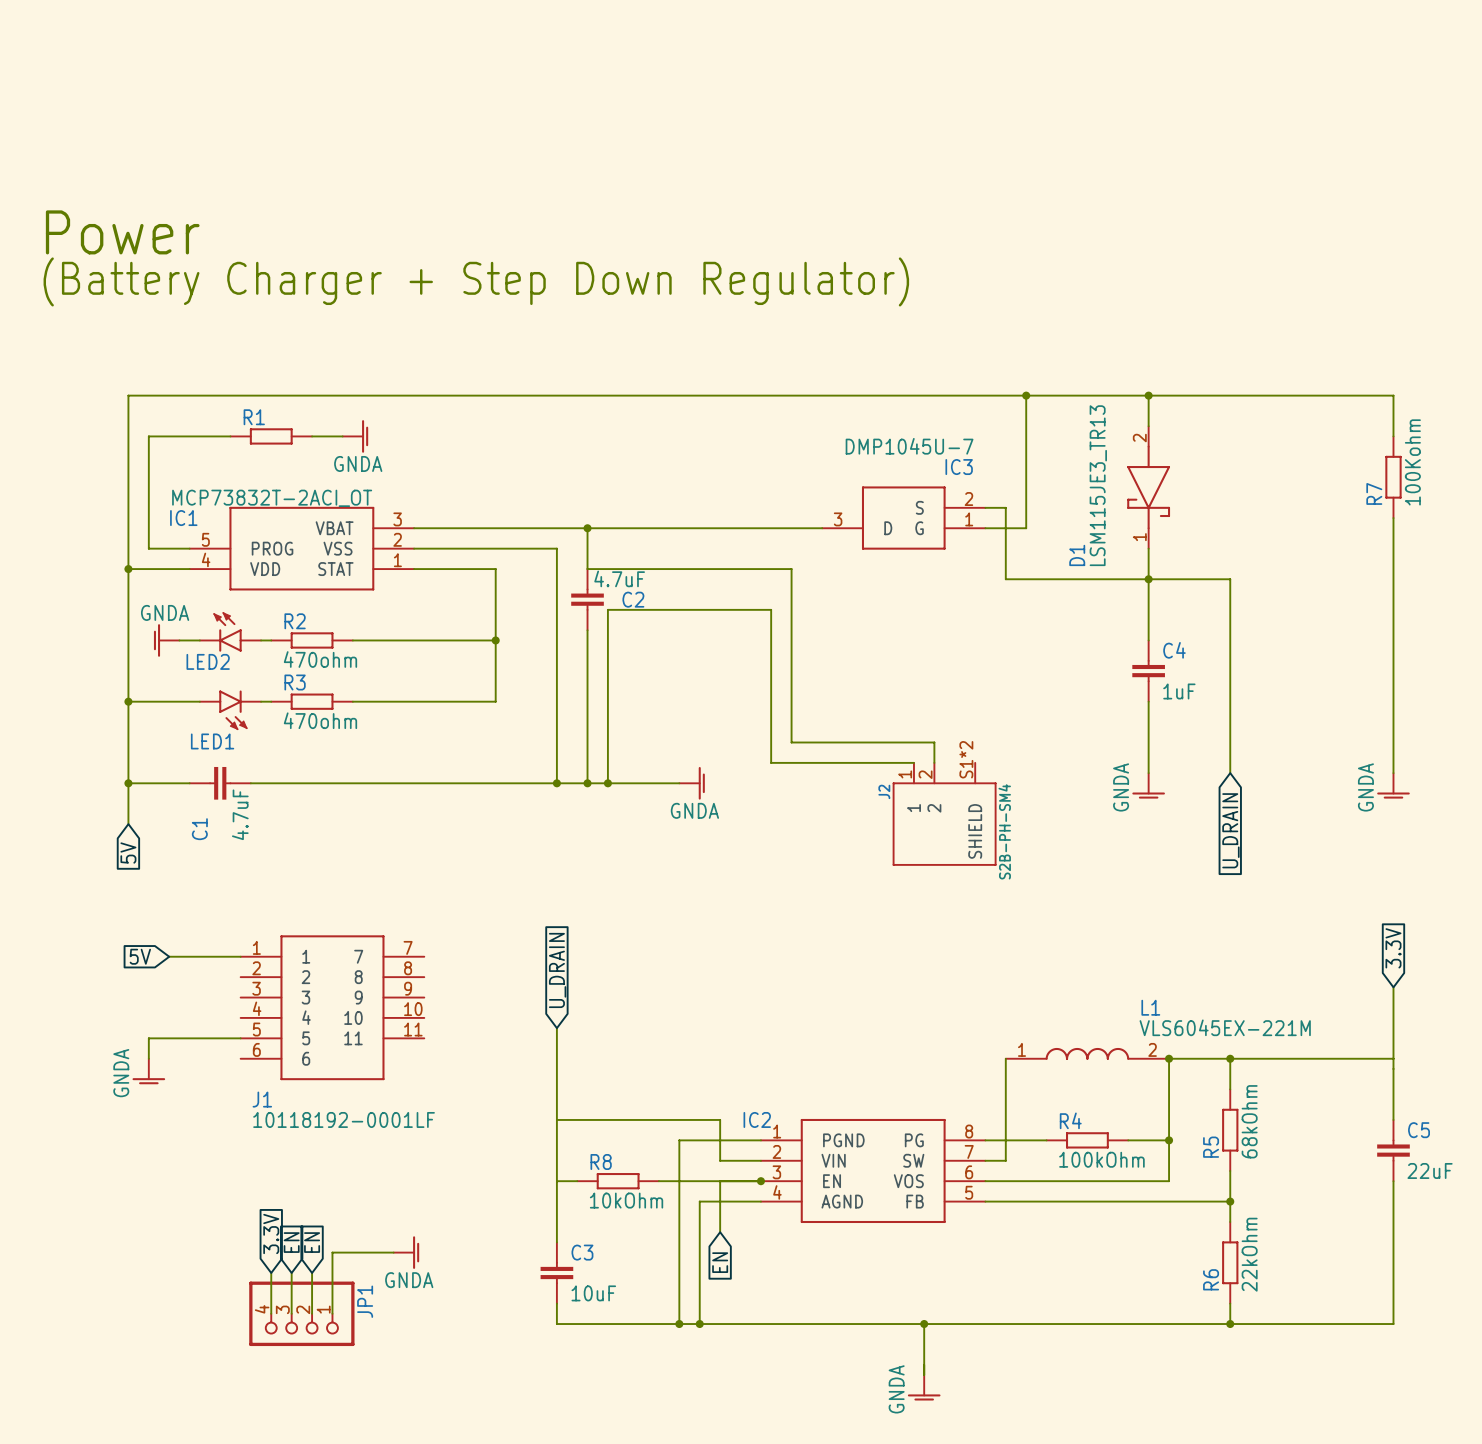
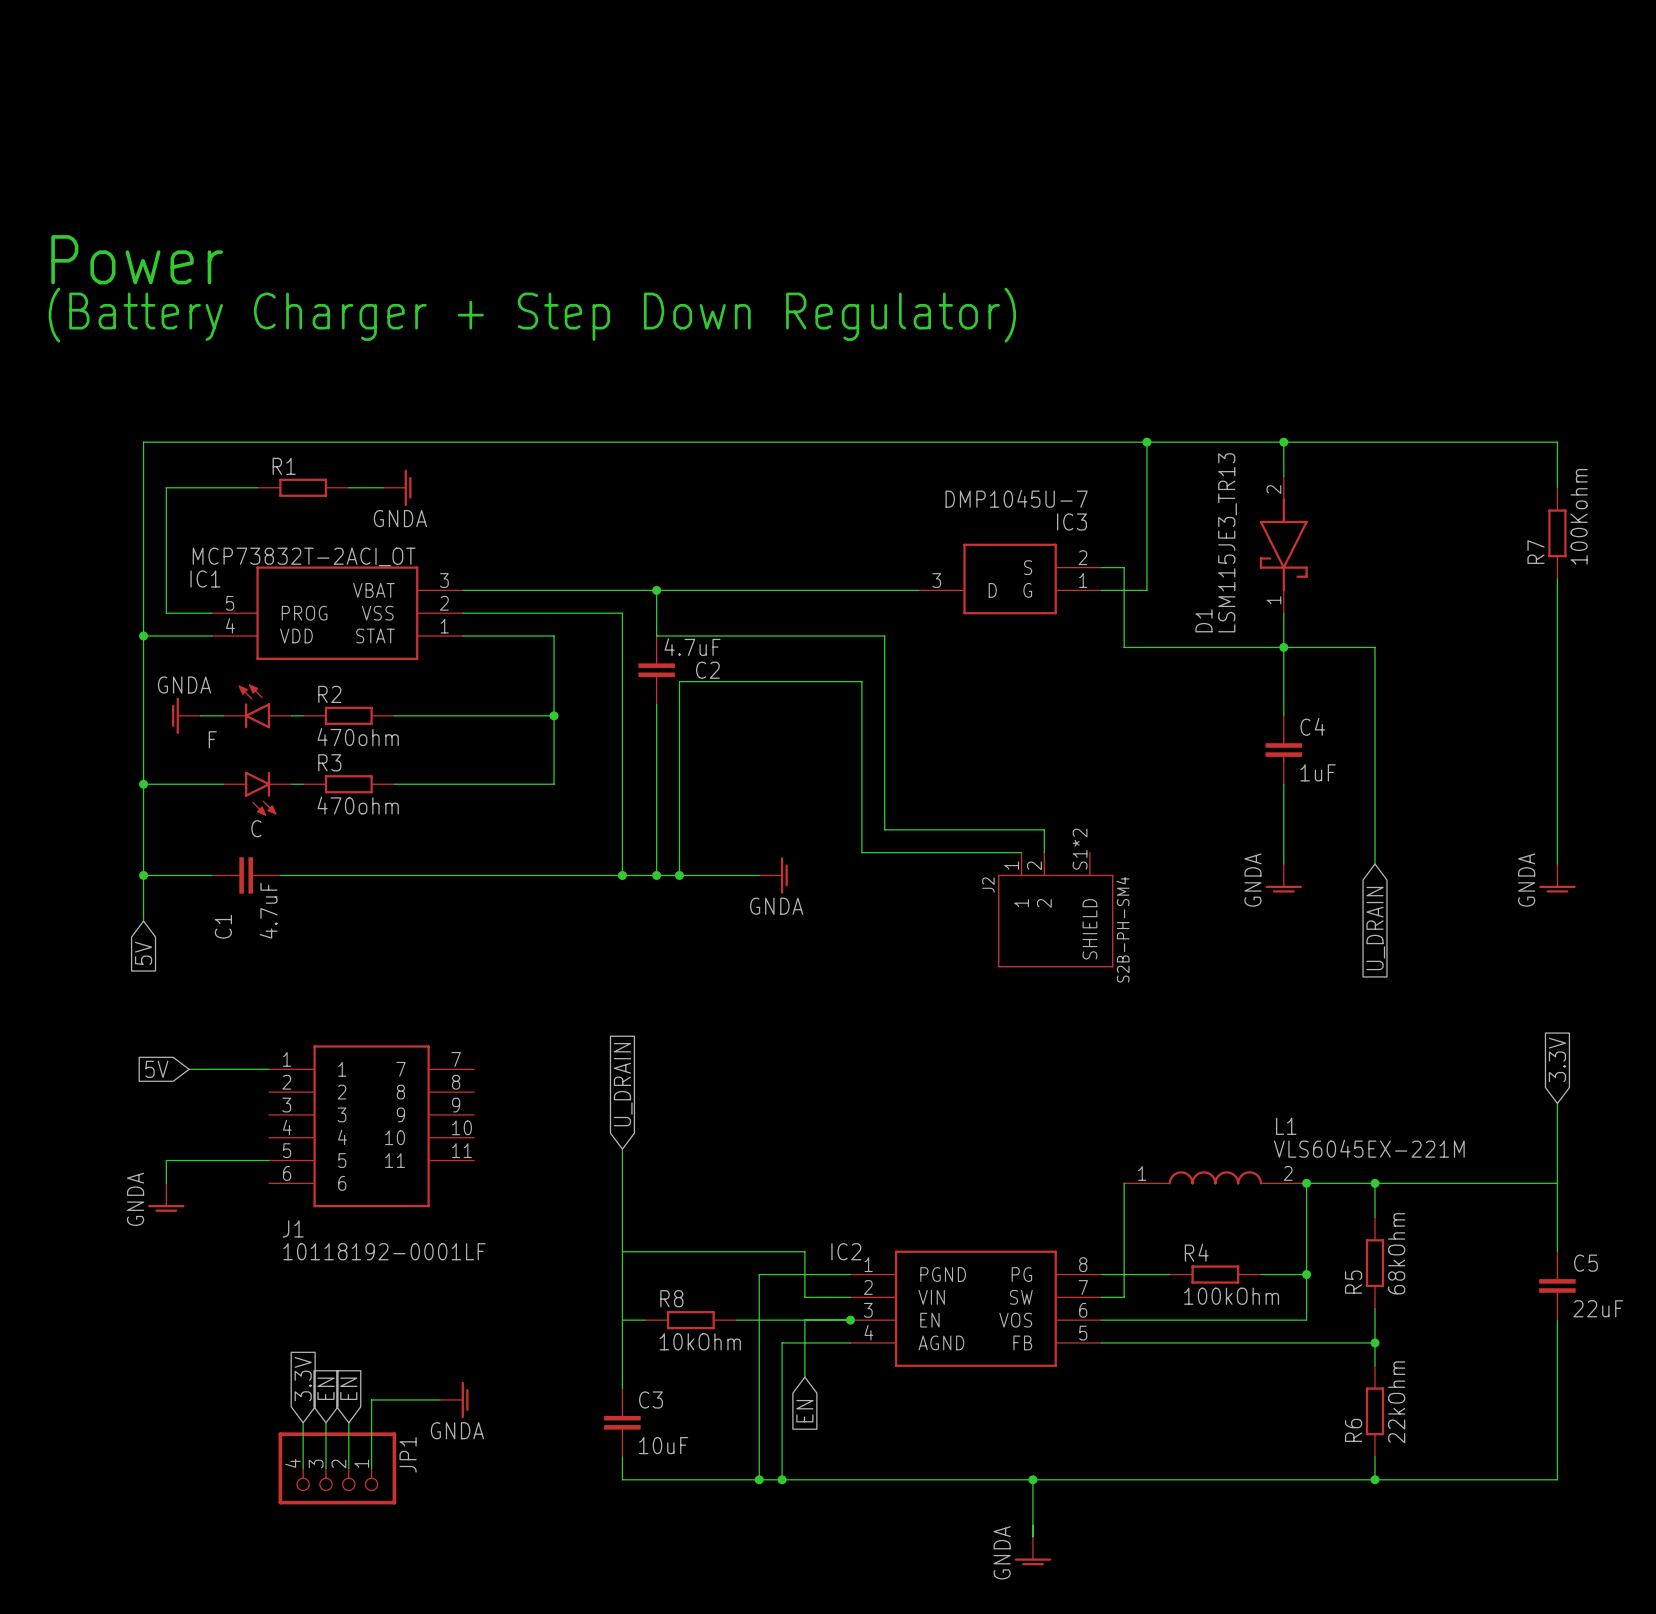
LED2 name: LED2 (208, 661) -> F (212, 739)
LED1 name: LED1 (212, 741) -> C (256, 828)

